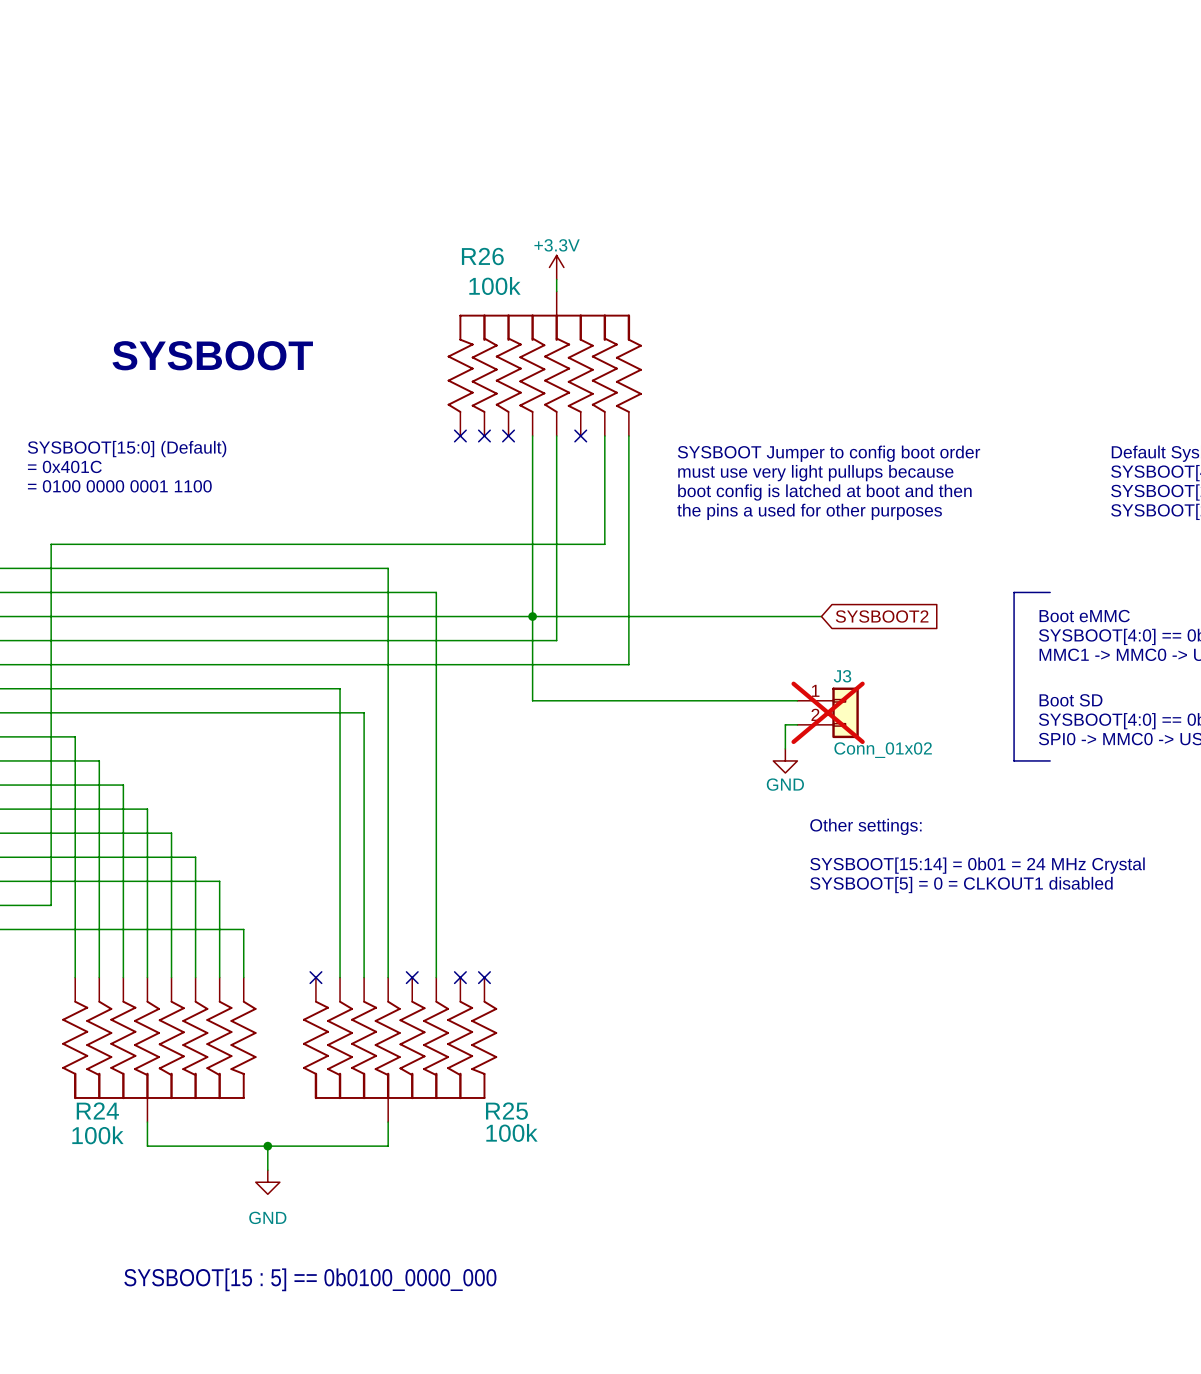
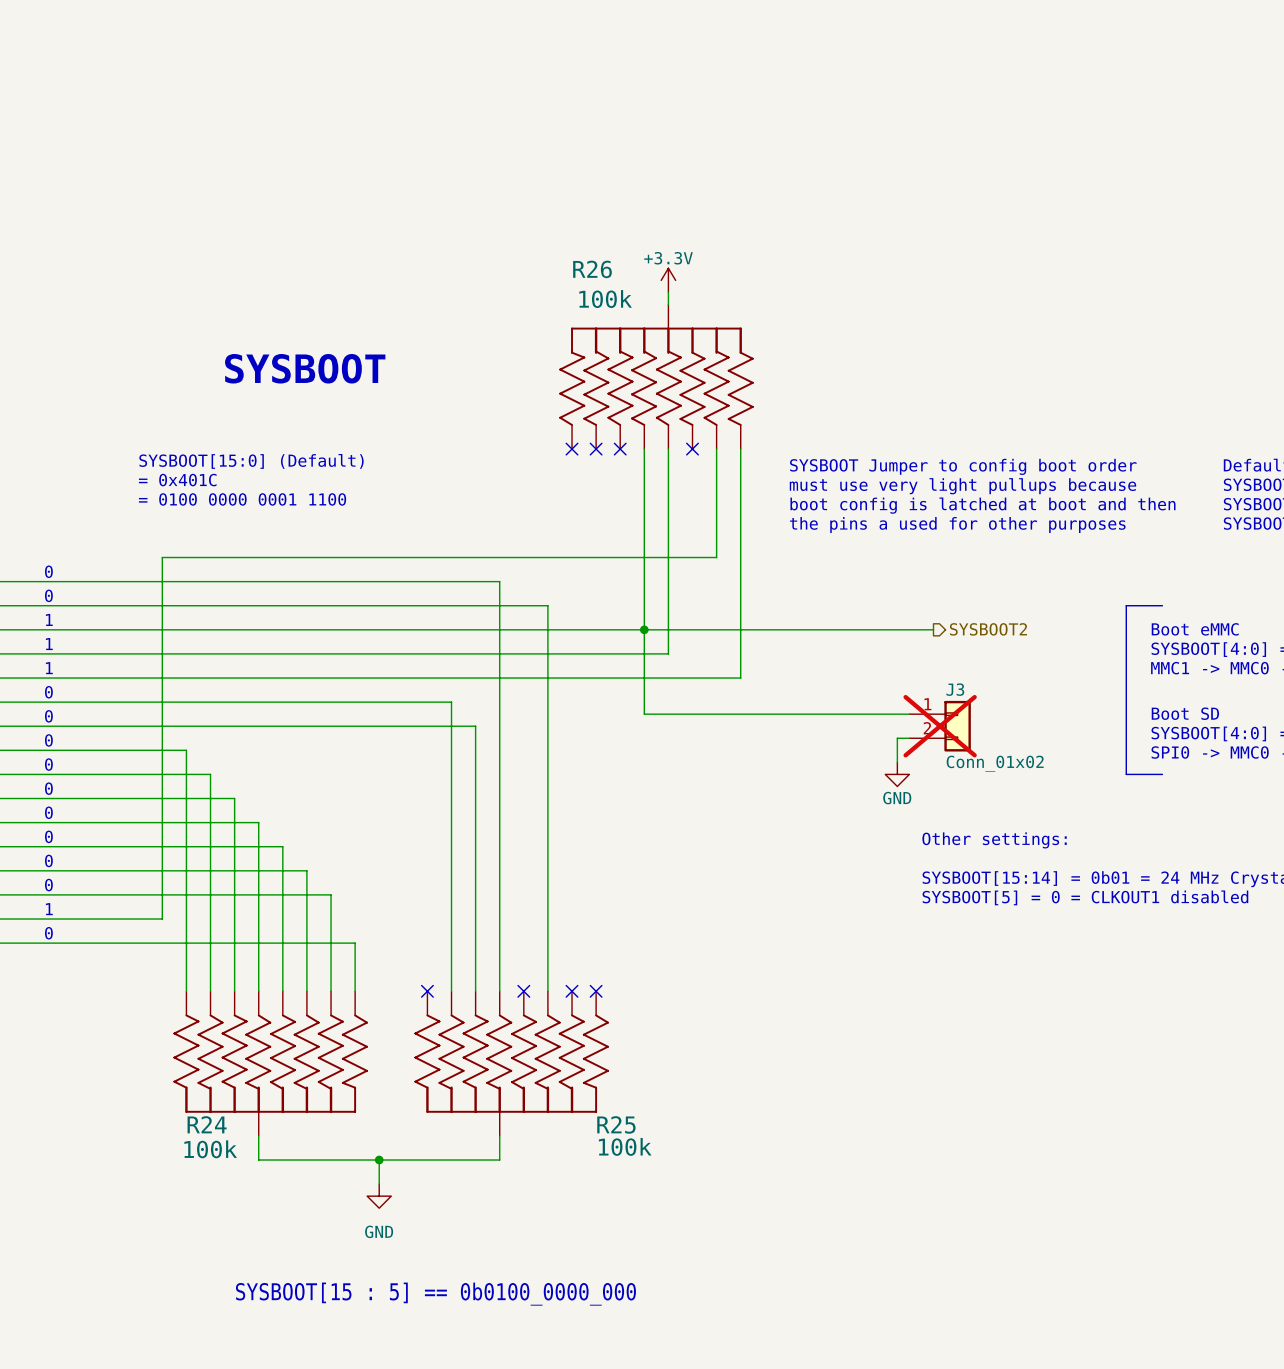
global label: SYSBOOT2 (882, 616) -> none
hierarchical label: none -> SYSBOOT2 (988, 629)

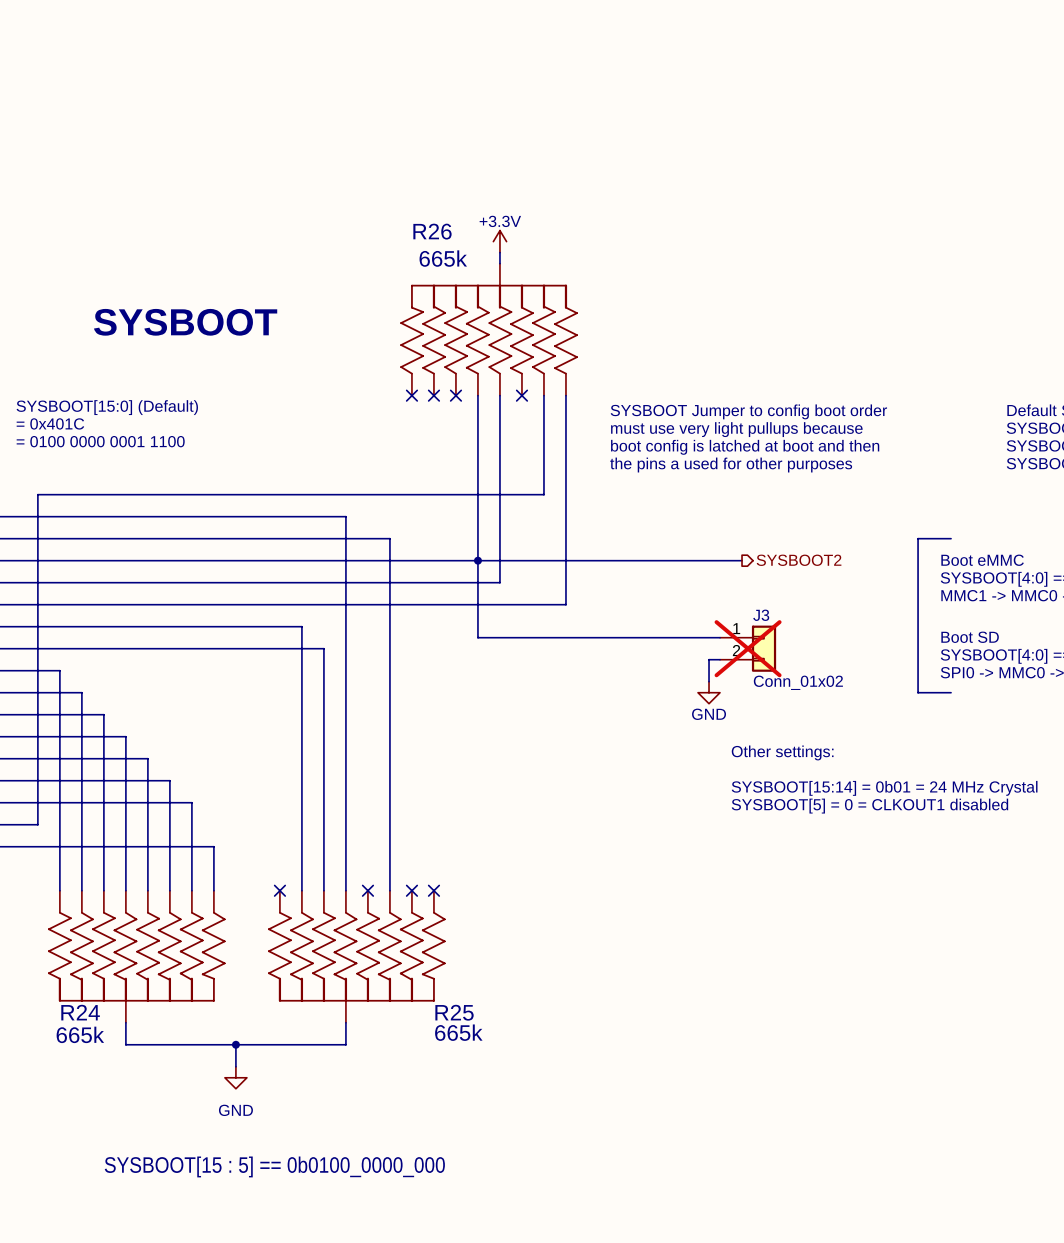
R26 value: 100k (605, 299) -> 665k (443, 258)
R25 value: 100k (625, 1146) -> 665k (458, 1032)
R24 value: 100k (210, 1149) -> 665k (80, 1034)

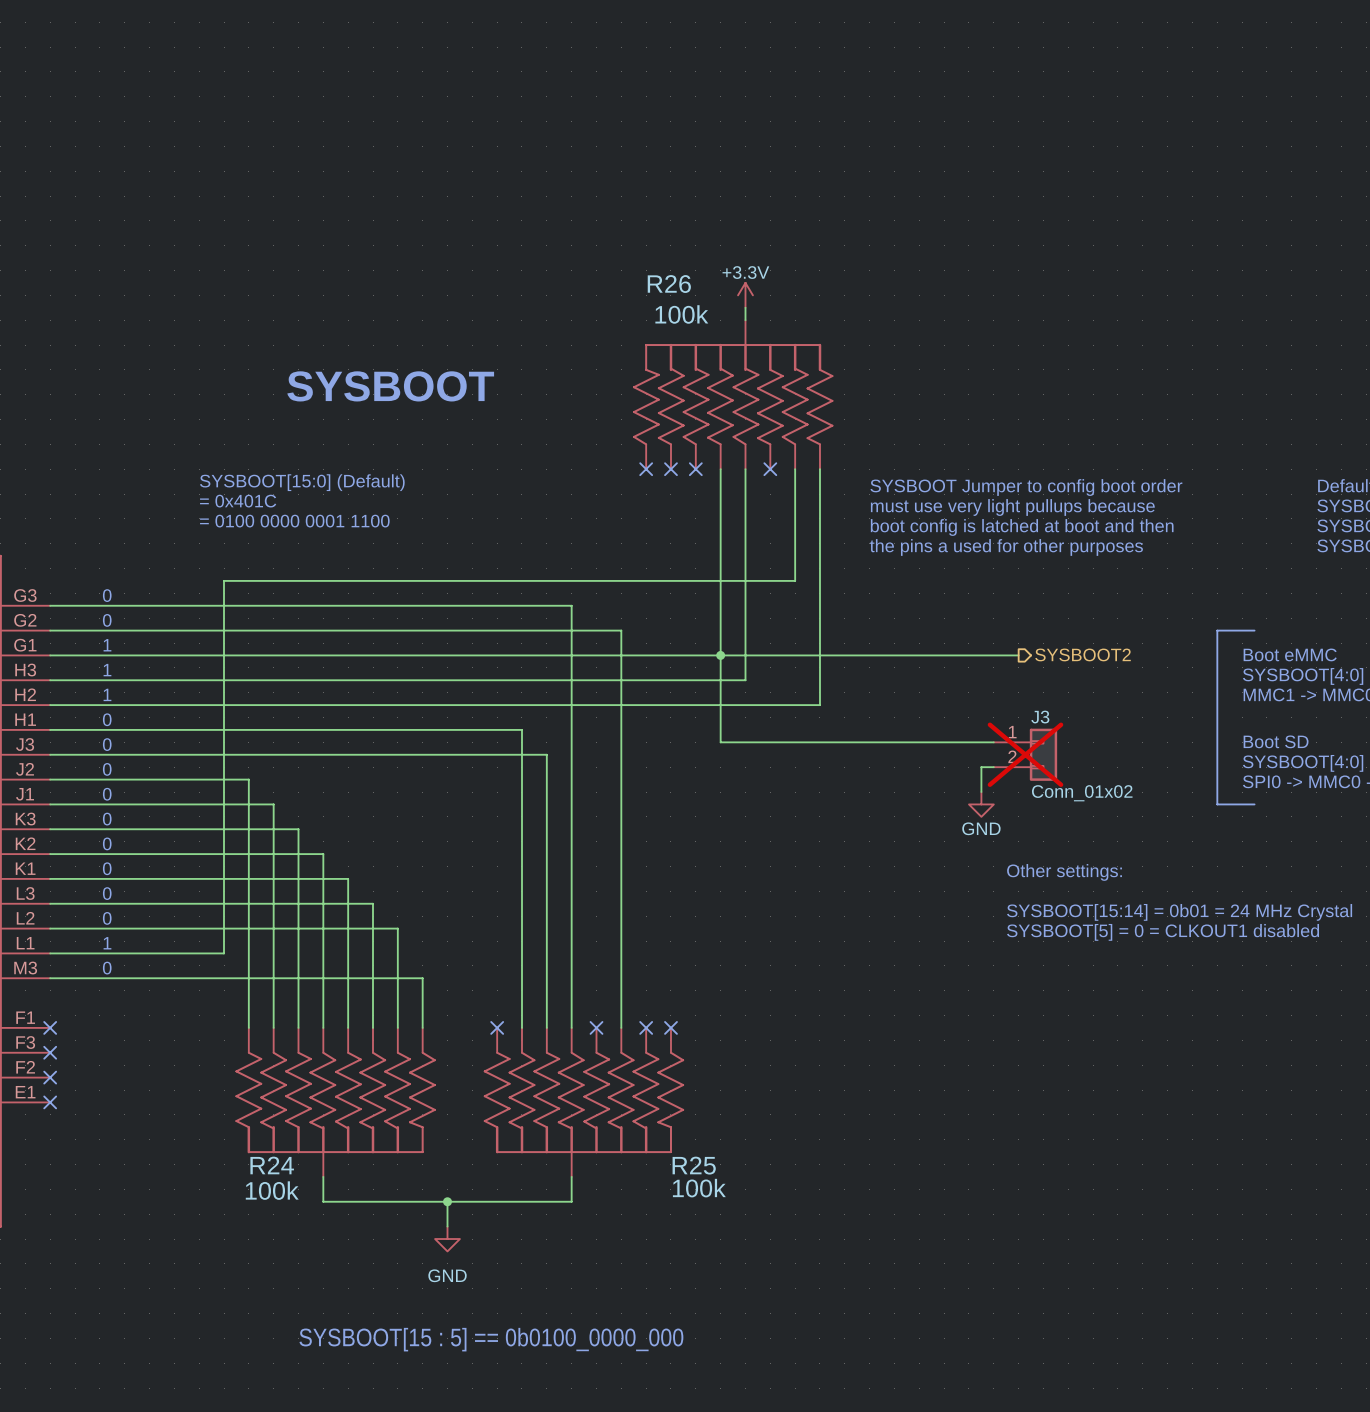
R26 value: 665k (443, 258) -> 100k (681, 314)
R25 value: 665k (458, 1032) -> 100k (699, 1188)
R24 value: 665k (80, 1034) -> 100k (272, 1190)

